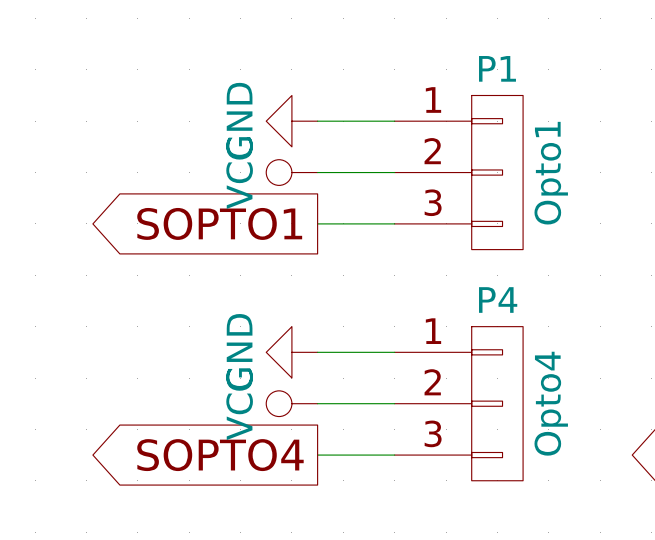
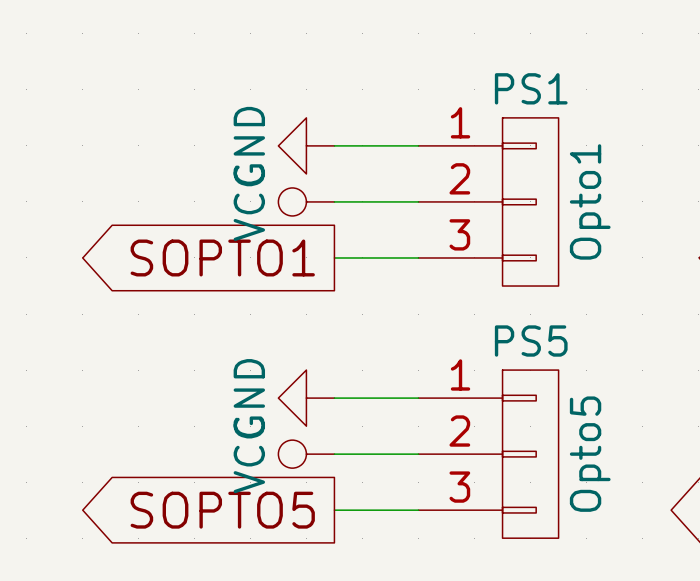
P1 name: P1 (497, 68) -> PS1 (531, 88)
P4 name: P4 (498, 300) -> PS5 (531, 341)
P4 value: Opto4 (551, 403) -> Opto5 (590, 454)
global label: SOPTO4 (220, 455) -> SOPTO5 (222, 510)

